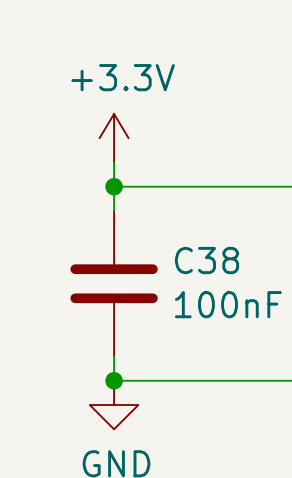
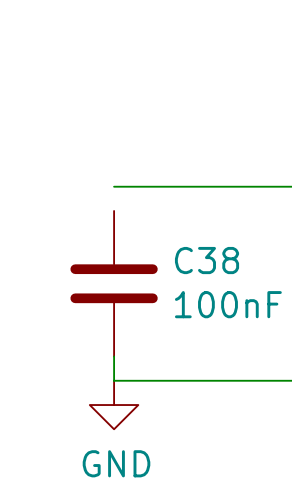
power symbol: +3.3V (114, 138) -> none
wire: (114, 162) (114, 210) -> none
junction: (114, 186) -> none
junction: (114, 380) -> none

